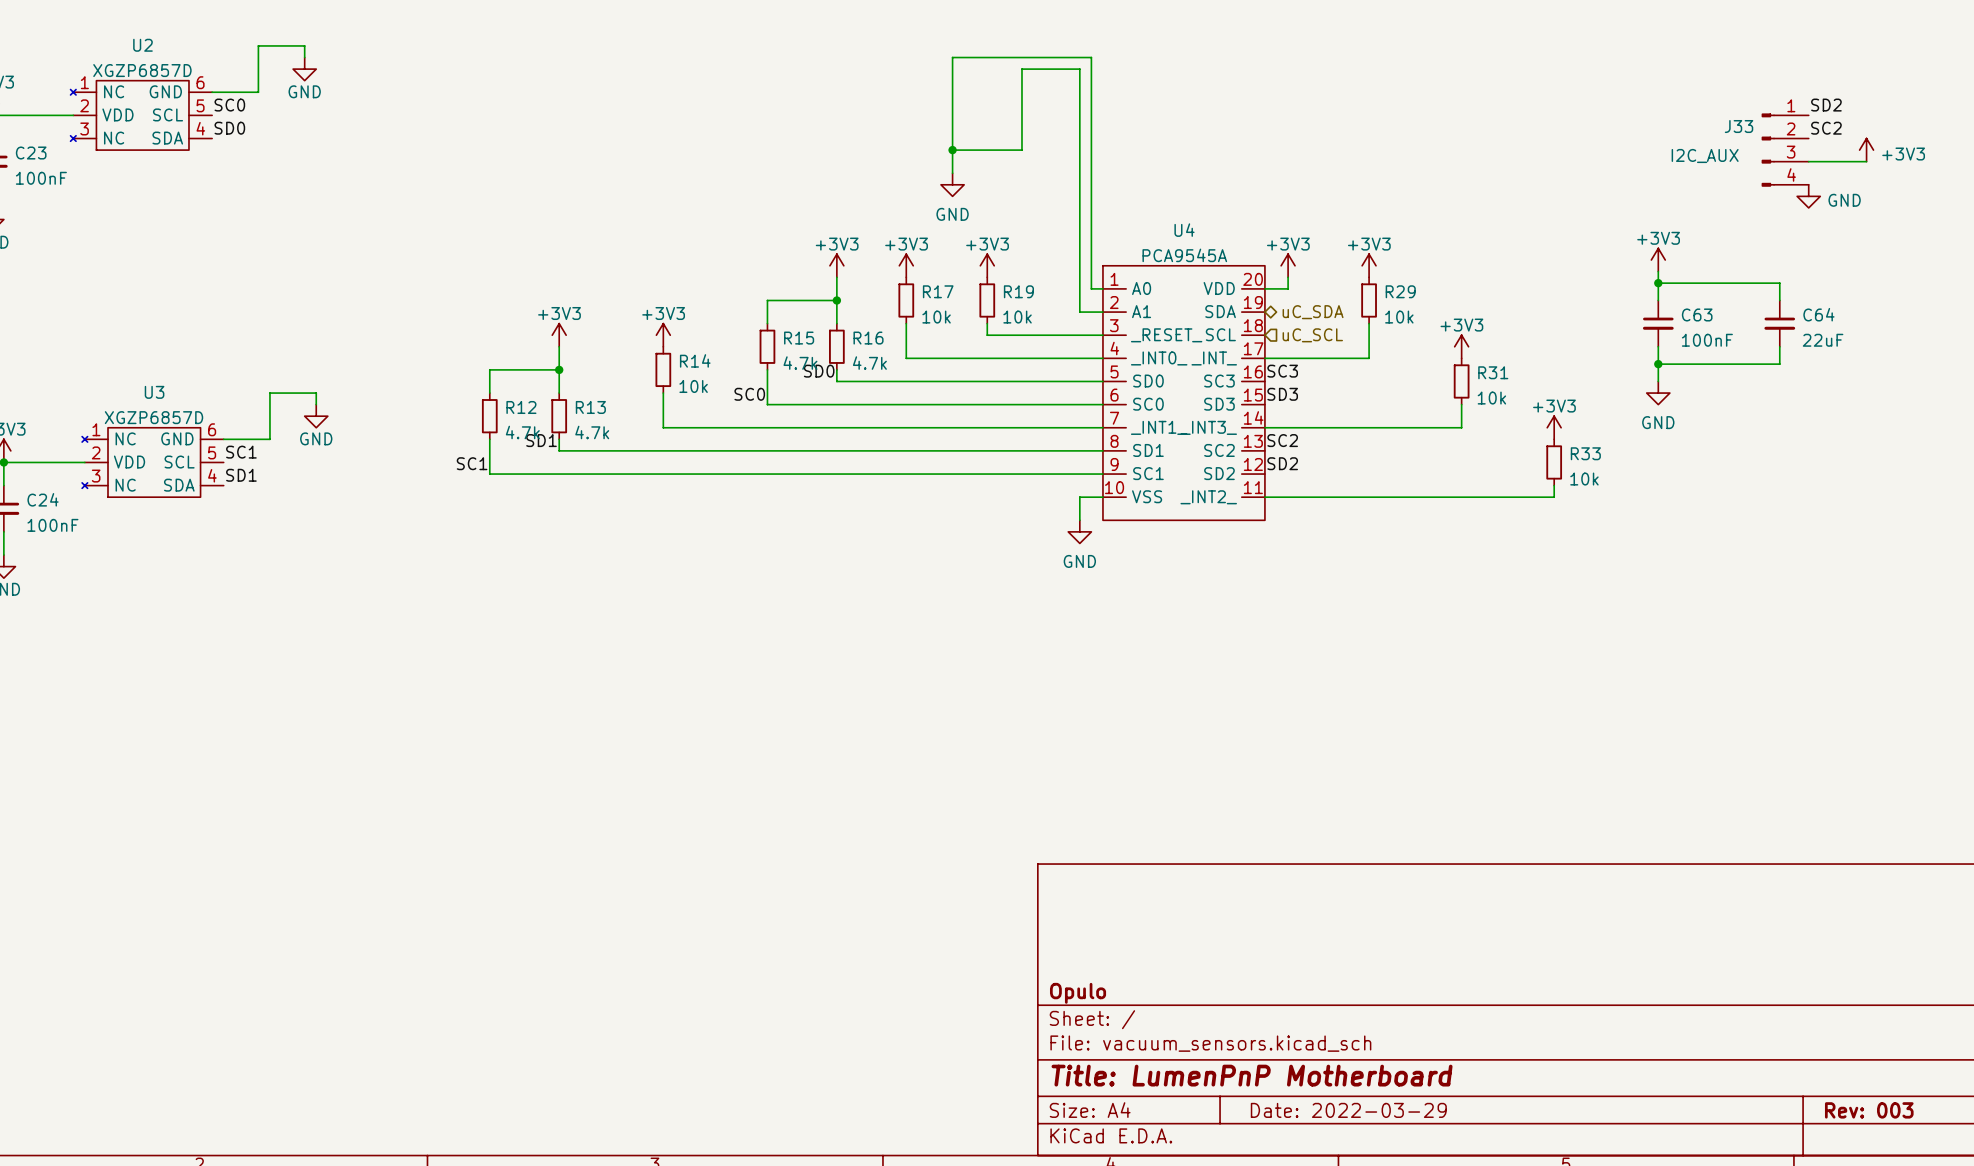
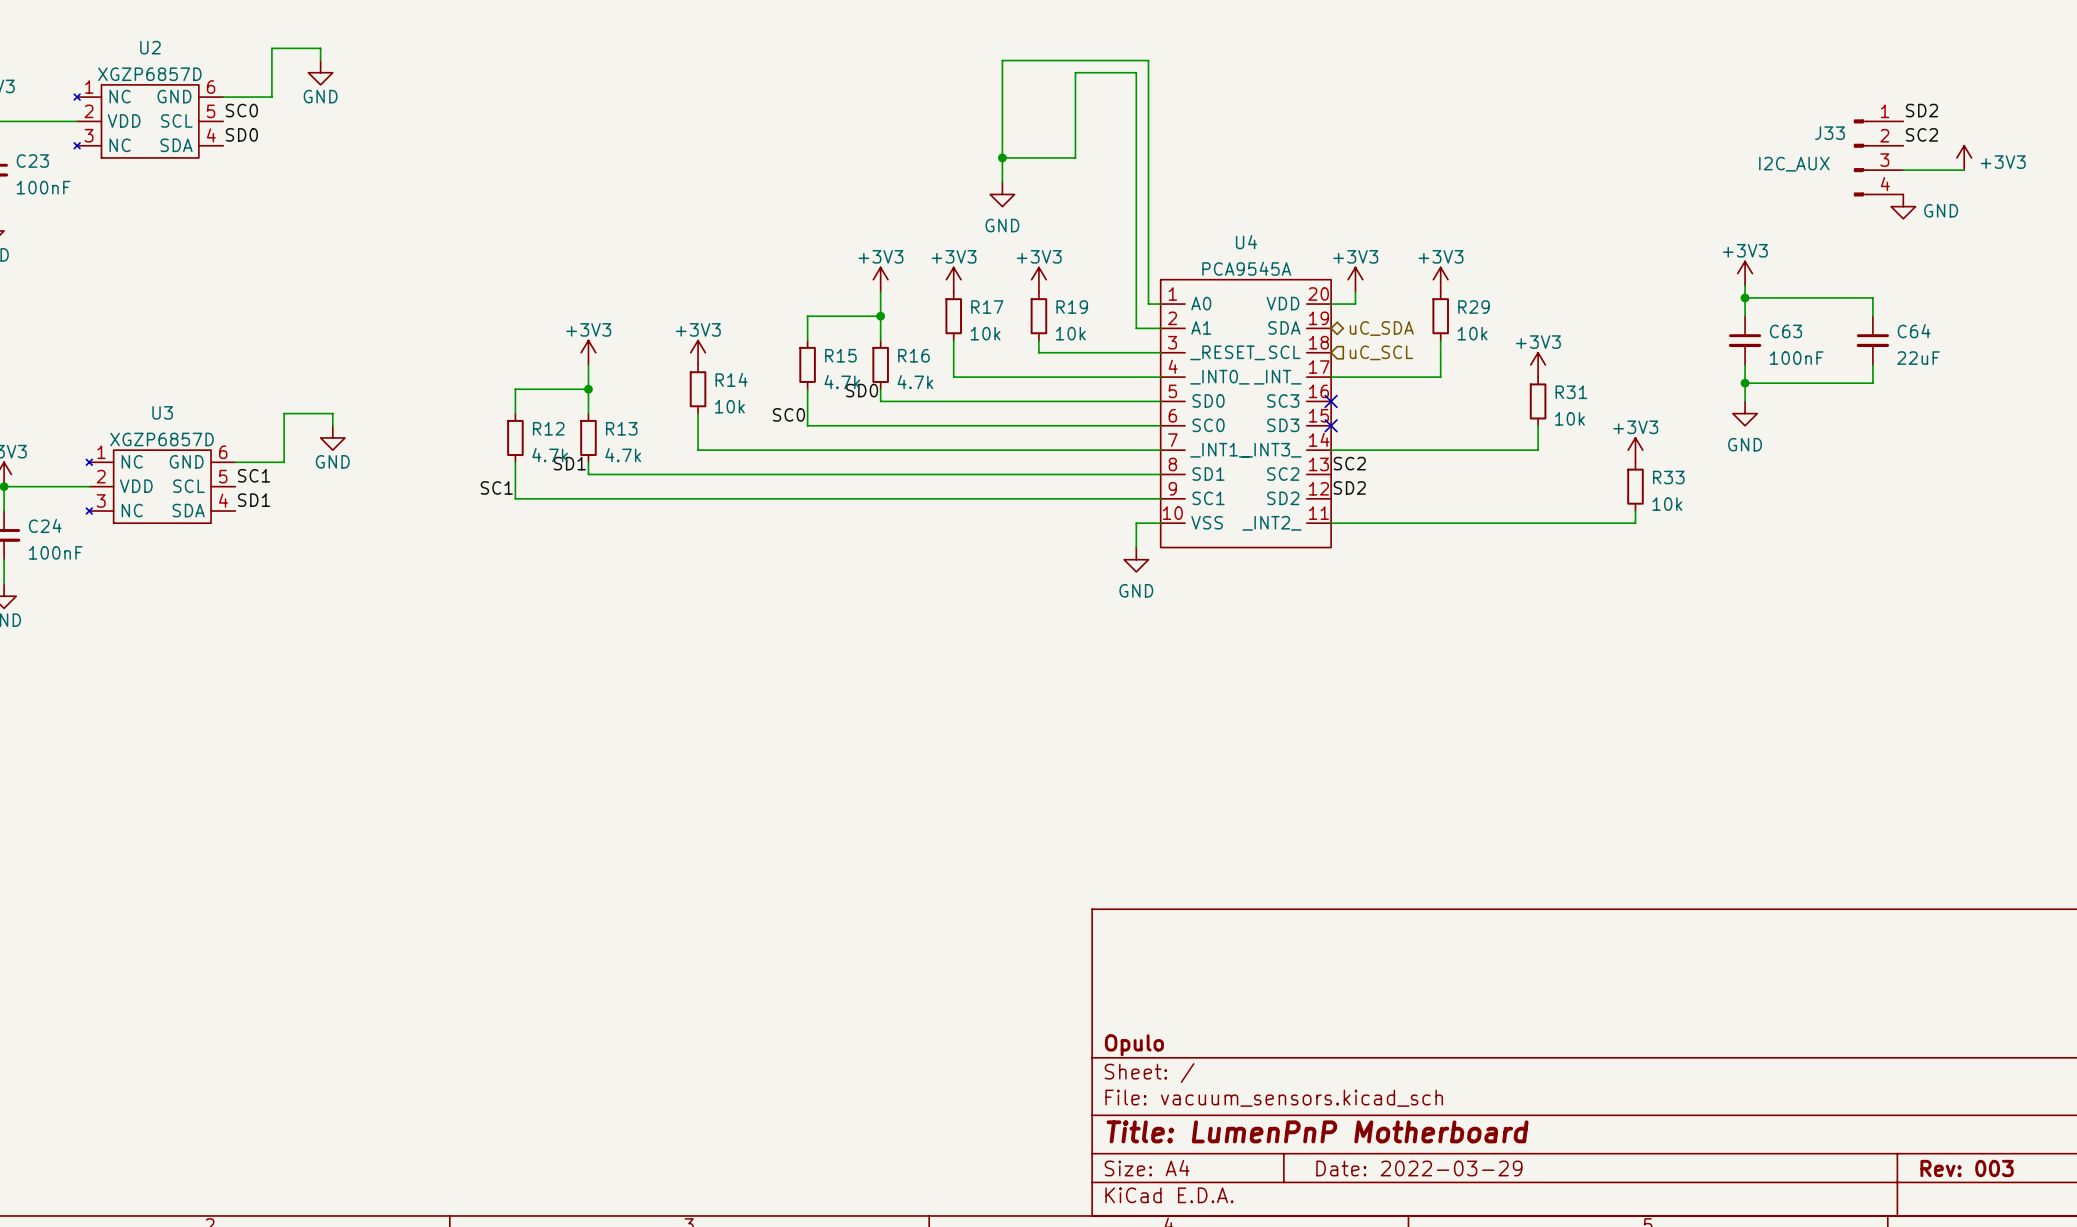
label: SC3 (1282, 371) -> none
no-connect mark: none -> (1331, 401)
label: SD3 (1282, 394) -> none
no-connect mark: none -> (1331, 425)

